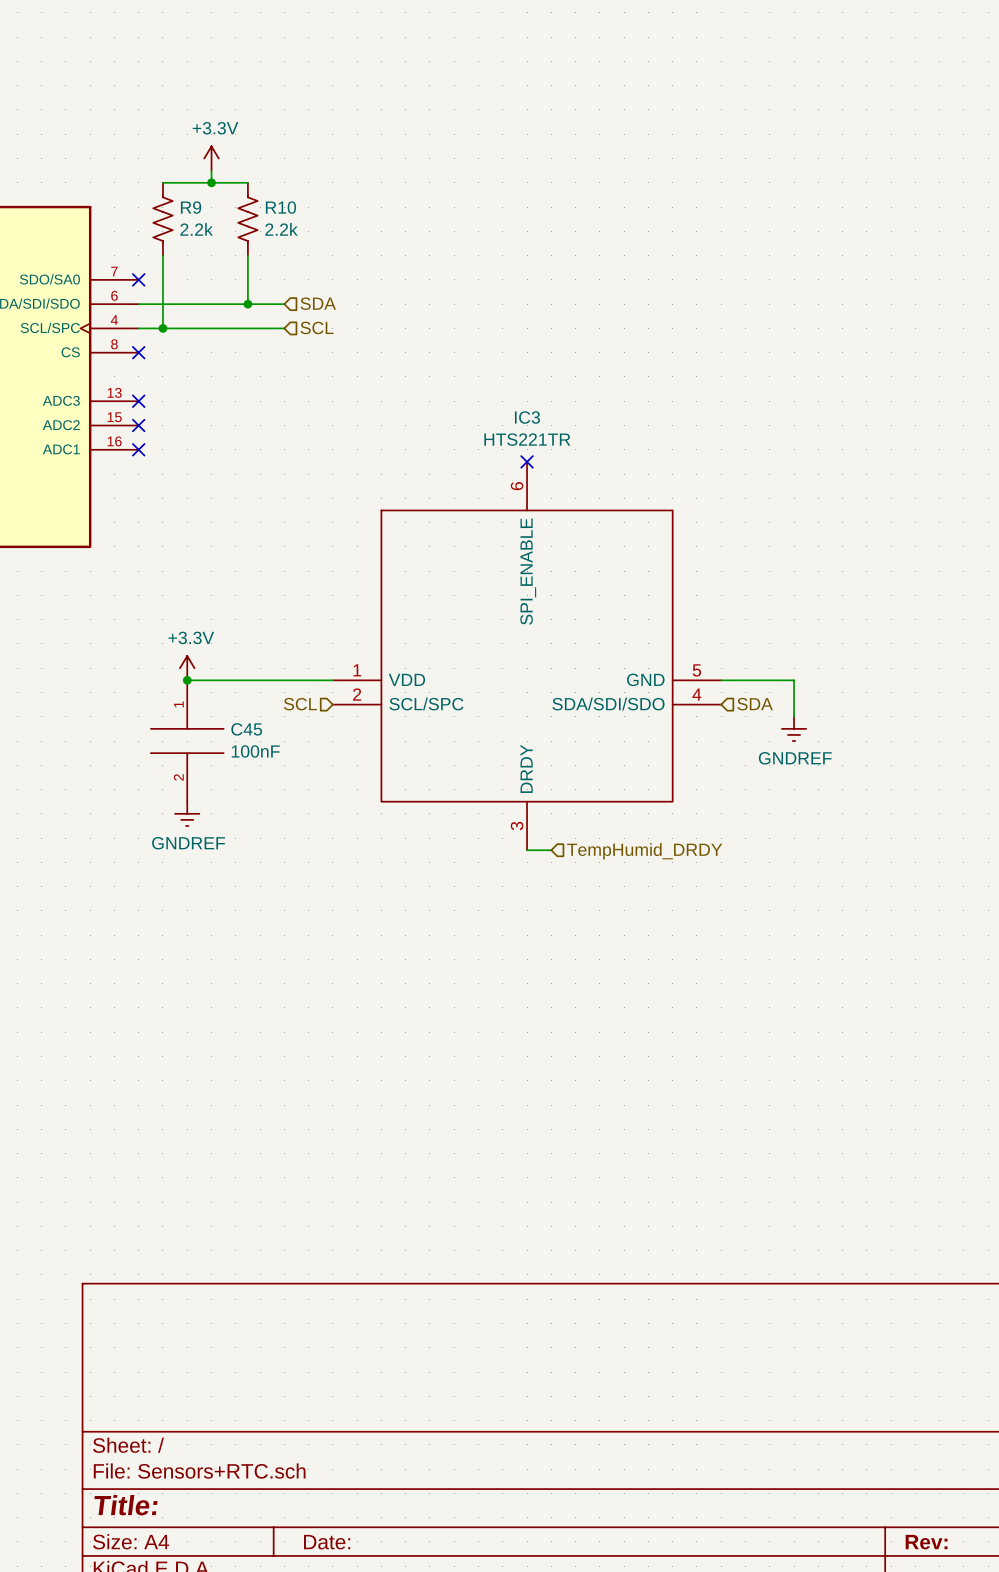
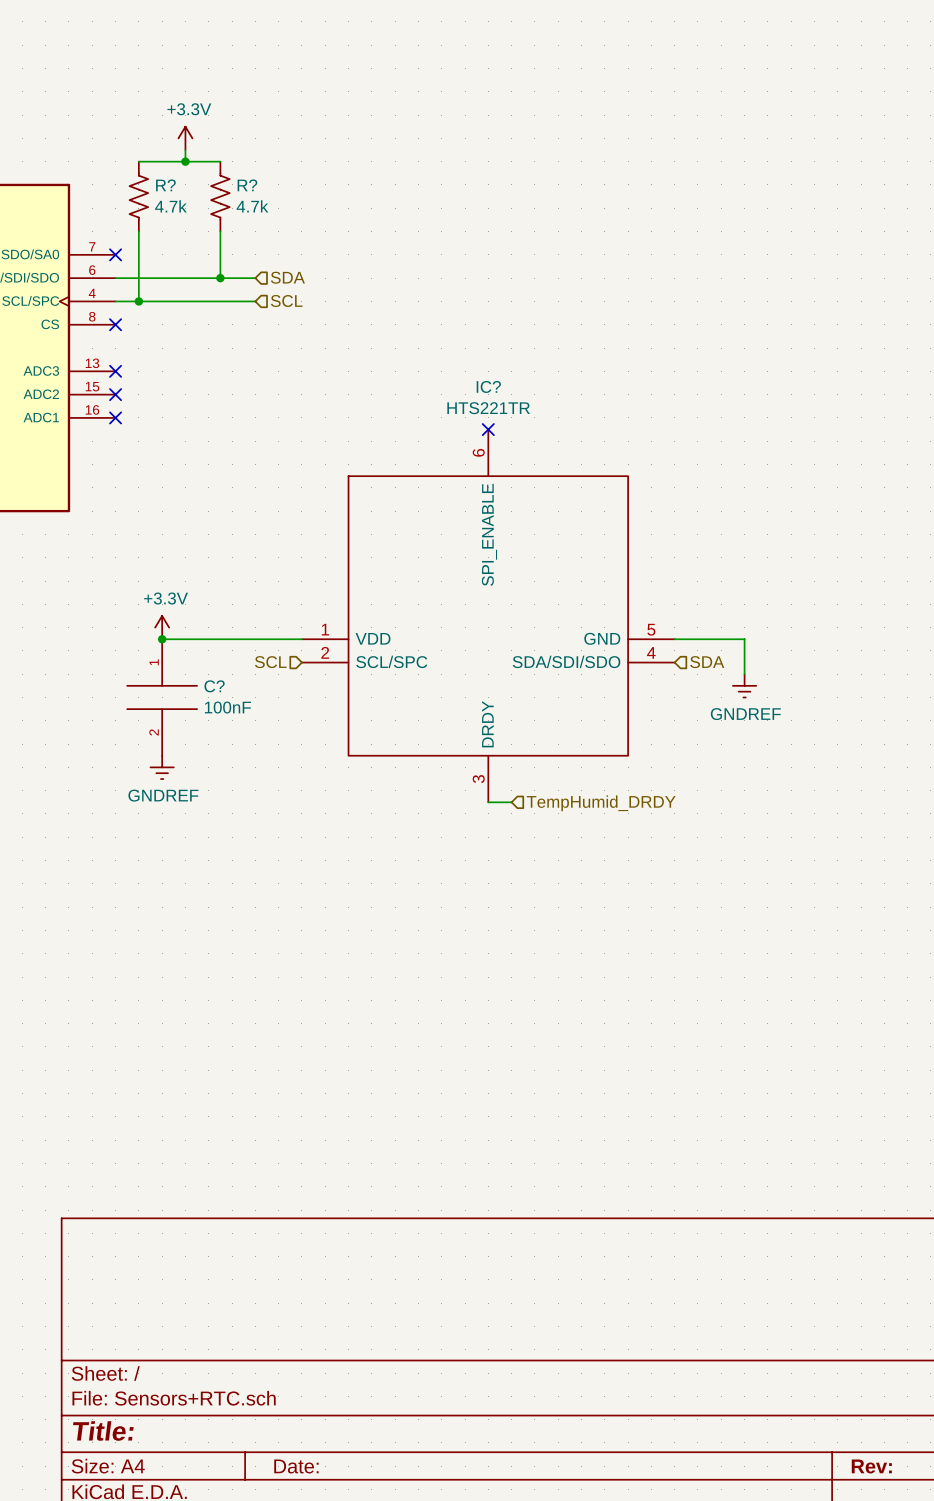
R9 name: R9 (191, 207) -> R? (165, 185)
R10 name: R10 (280, 207) -> R? (247, 185)
R9 value: 2.2k (196, 229) -> 4.7k (170, 206)
R10 value: 2.2k (281, 229) -> 4.7k (252, 206)
IC3 name: IC3 (527, 417) -> IC? (488, 386)
C45 name: C45 (246, 729) -> C? (214, 686)

